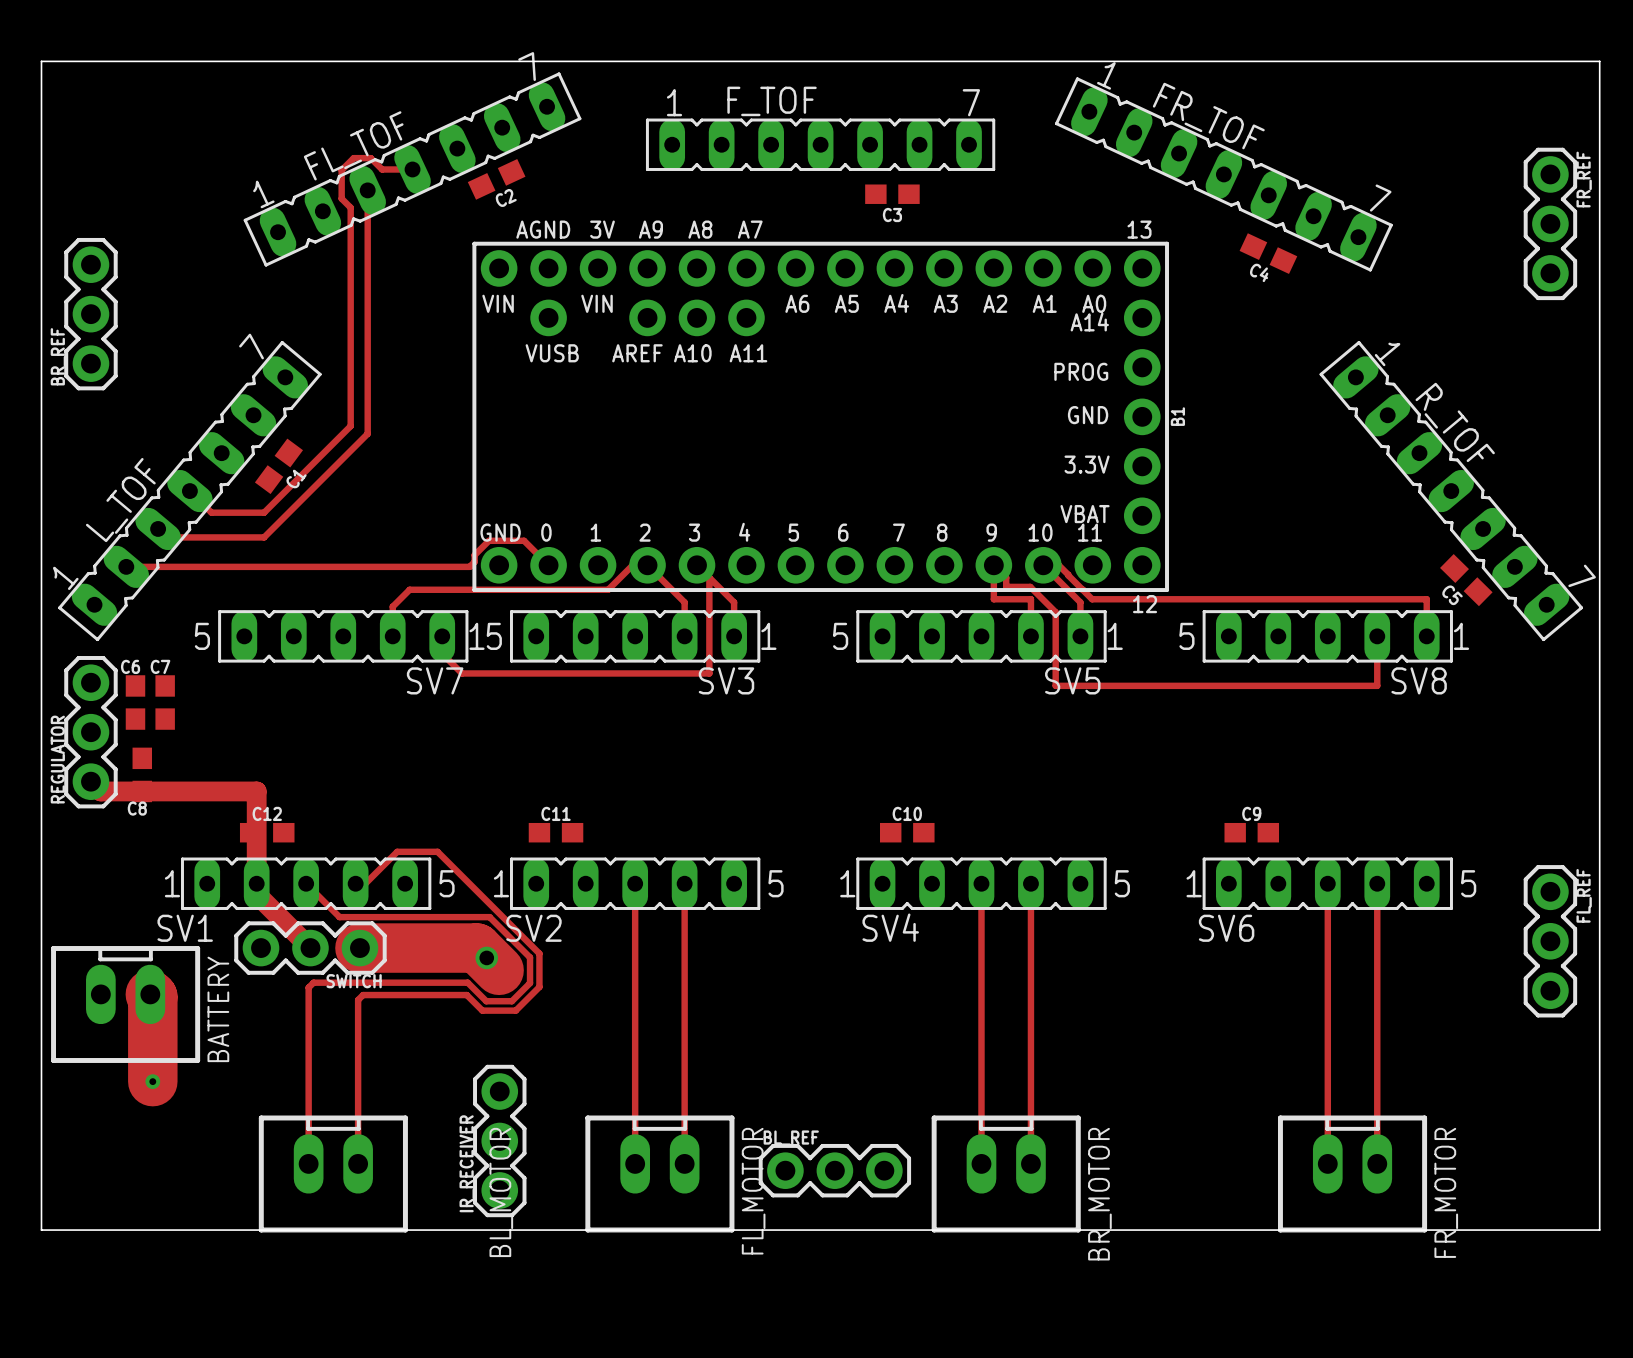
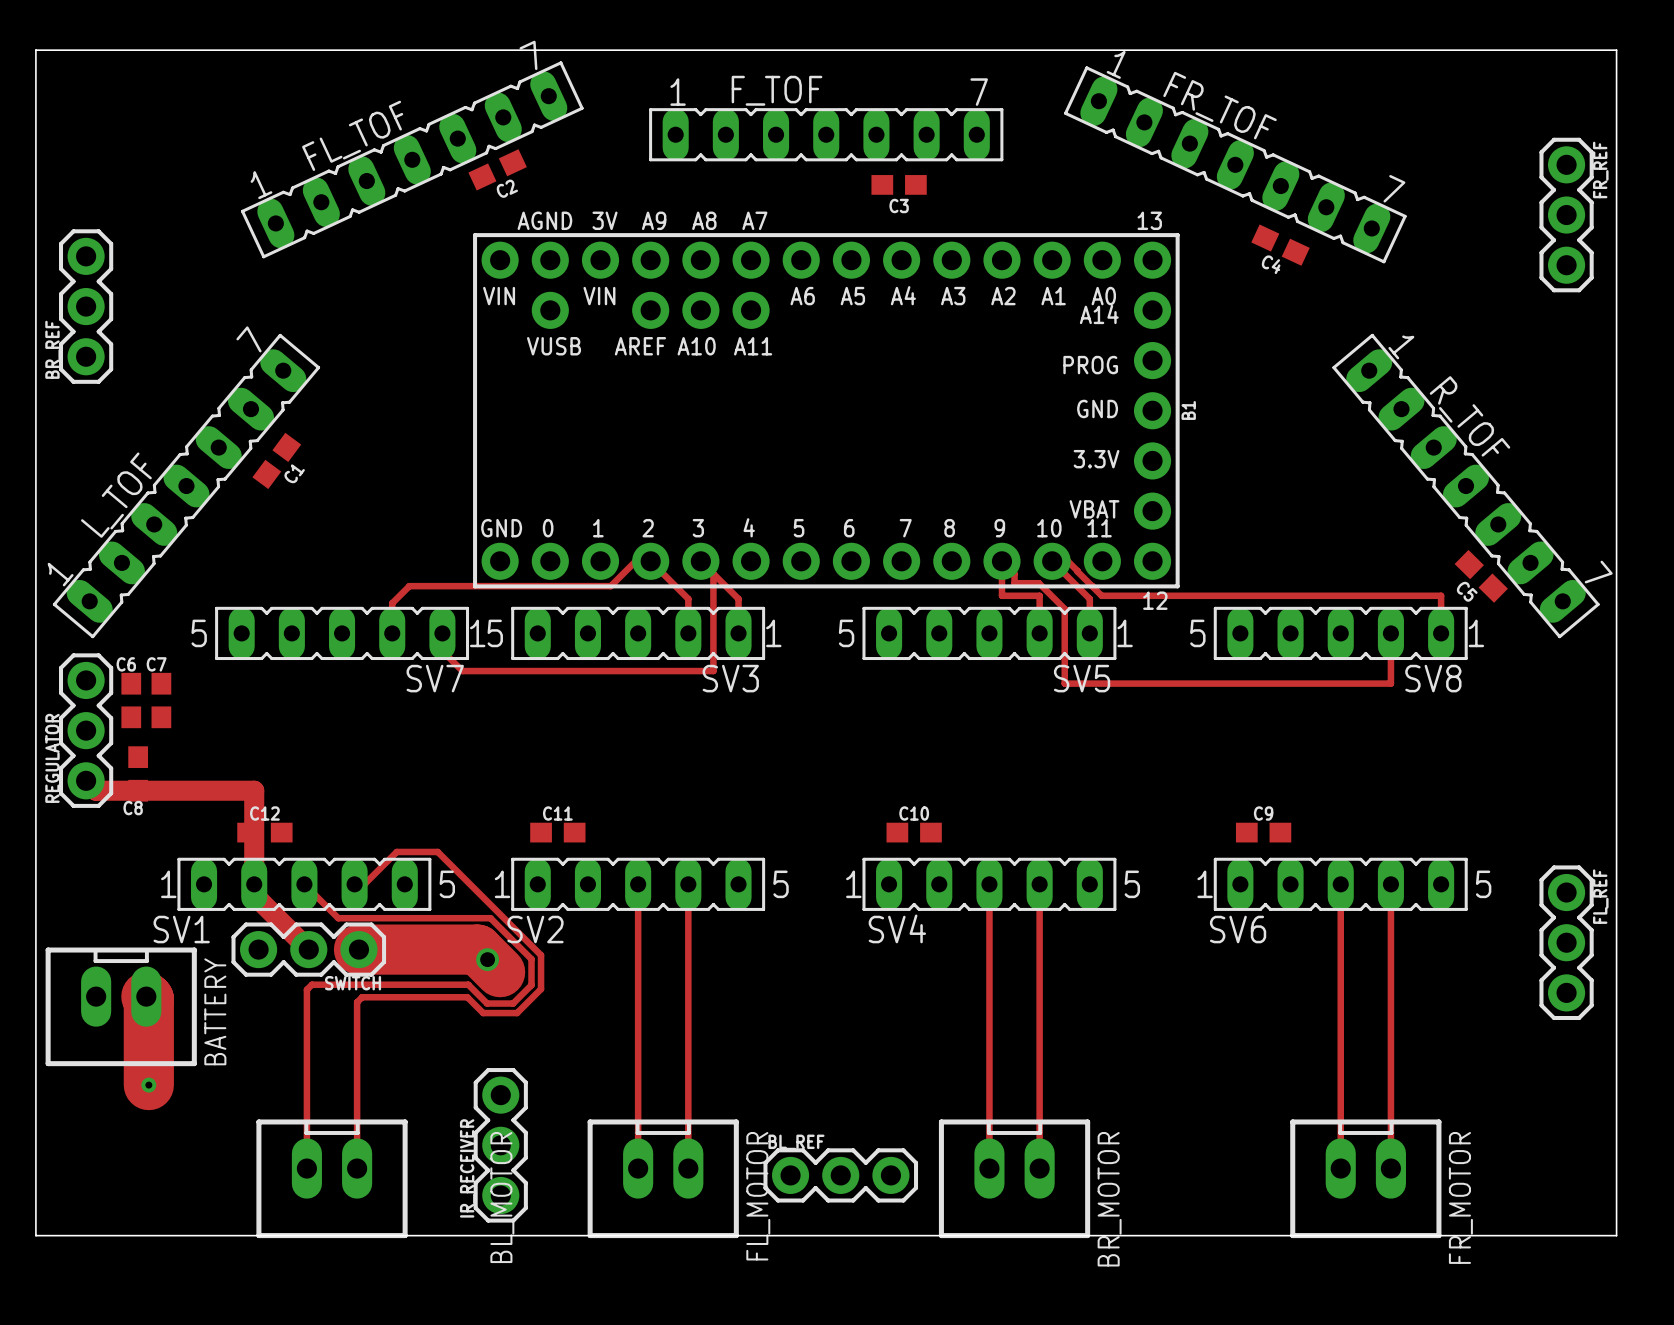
track: (412, 169) (382, 169) (370, 158) (353, 158) (341, 170) (341, 198) (350, 207) (350, 426) (264, 512) (211, 512) (189, 491) -> none
track: (367, 190) (367, 433) (264, 537) (166, 537) (158, 528) -> none
track: (548, 565) (524, 540) (488, 540) (474, 555) (474, 561) (469, 566) (126, 566) -> none

